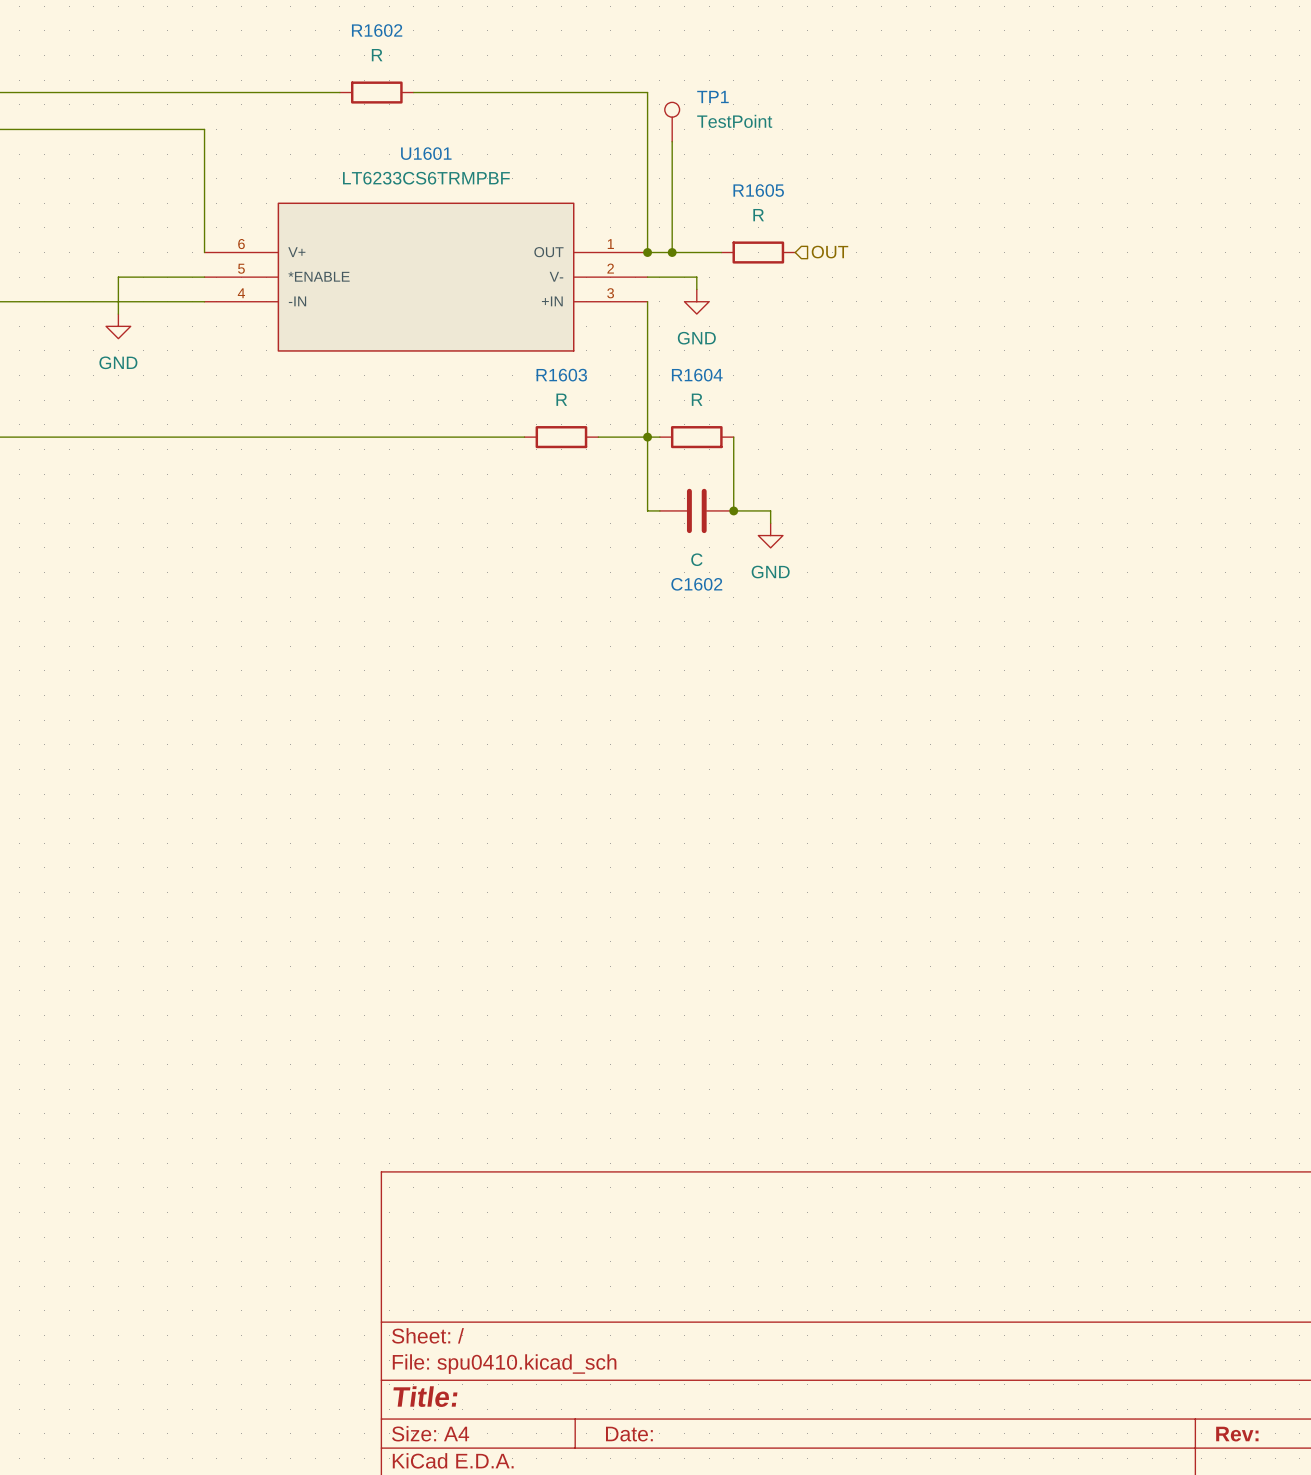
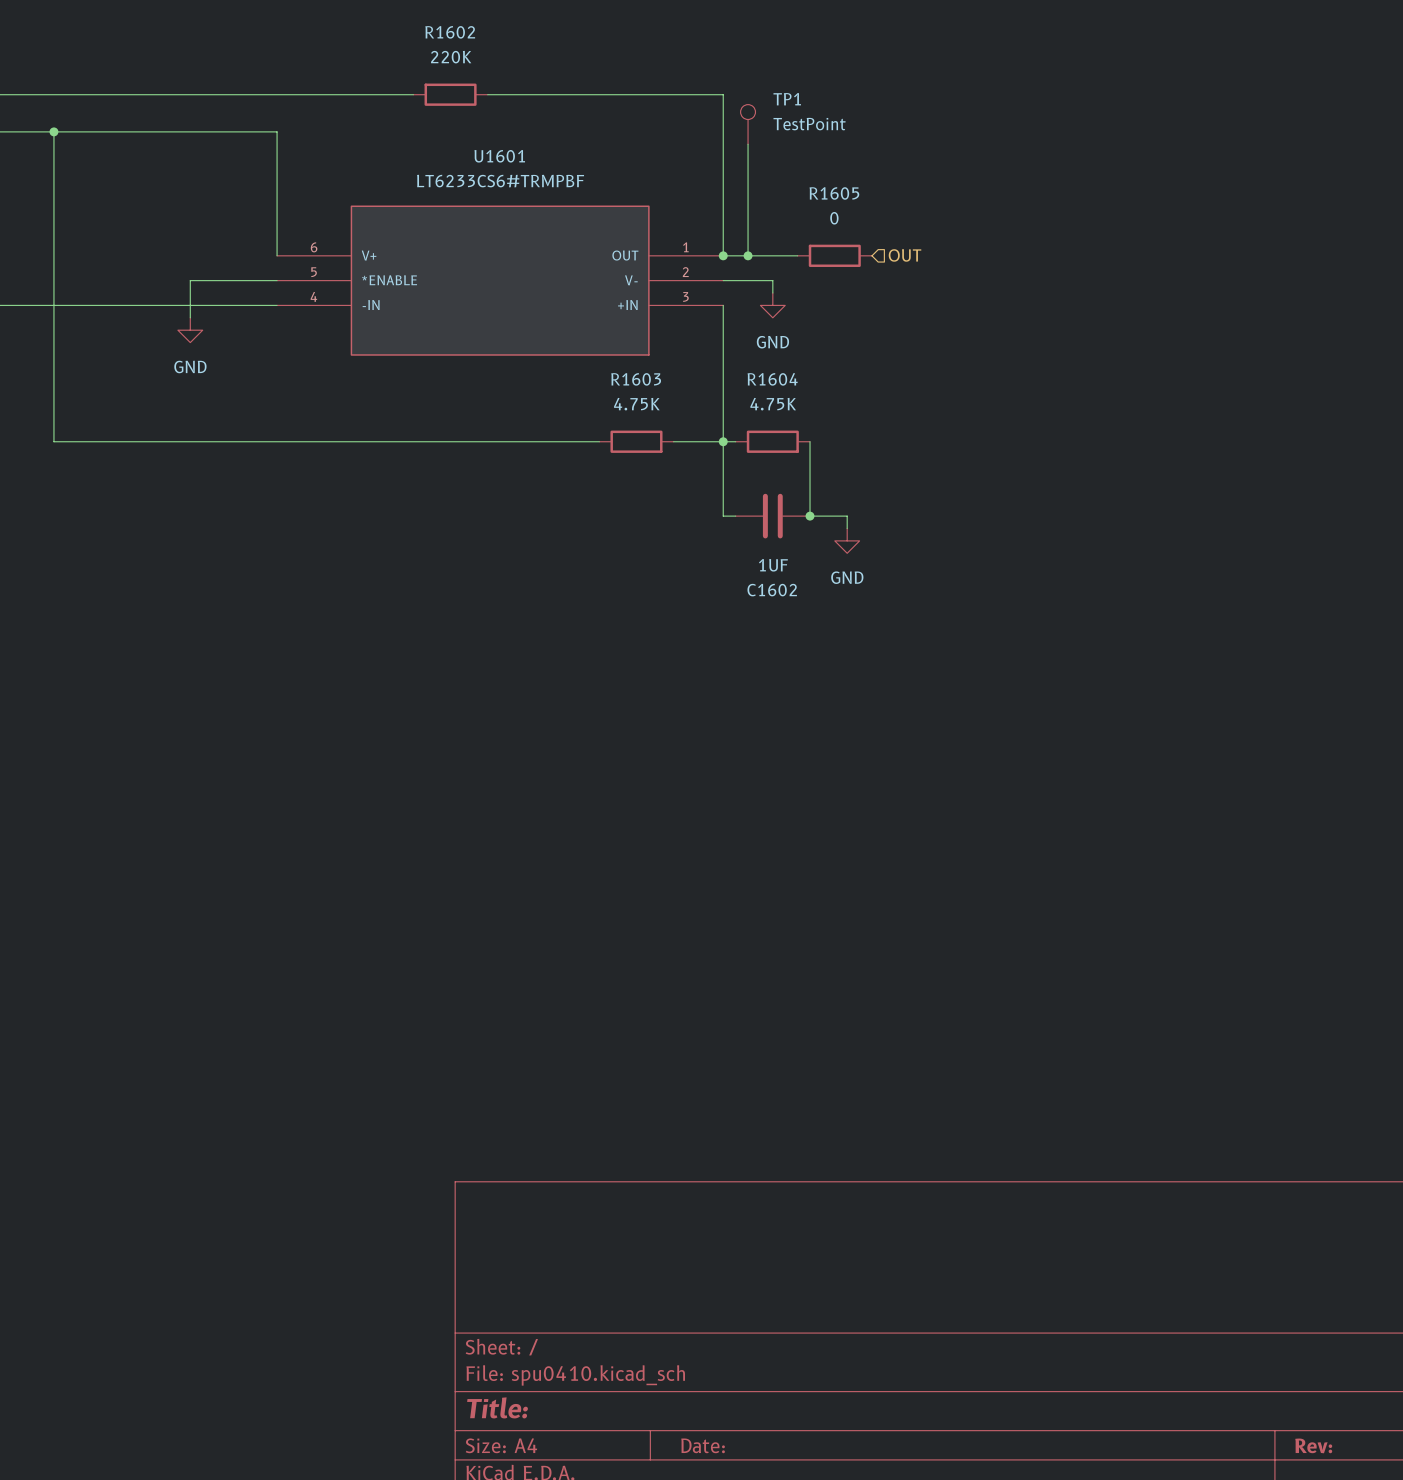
R1602 value: R (377, 55) -> 220K (451, 57)
U1601 value: LT6233CS6TRMPBF (426, 178) -> LT6233CS6#TRMPBF (500, 181)
R1605 value: R (758, 215) -> 0 (834, 218)
R1603 value: R (561, 399) -> 4.75K (636, 404)
R1604 value: R (697, 399) -> 4.75K (773, 404)
C1602 value: C (696, 559) -> 1UF (773, 565)

